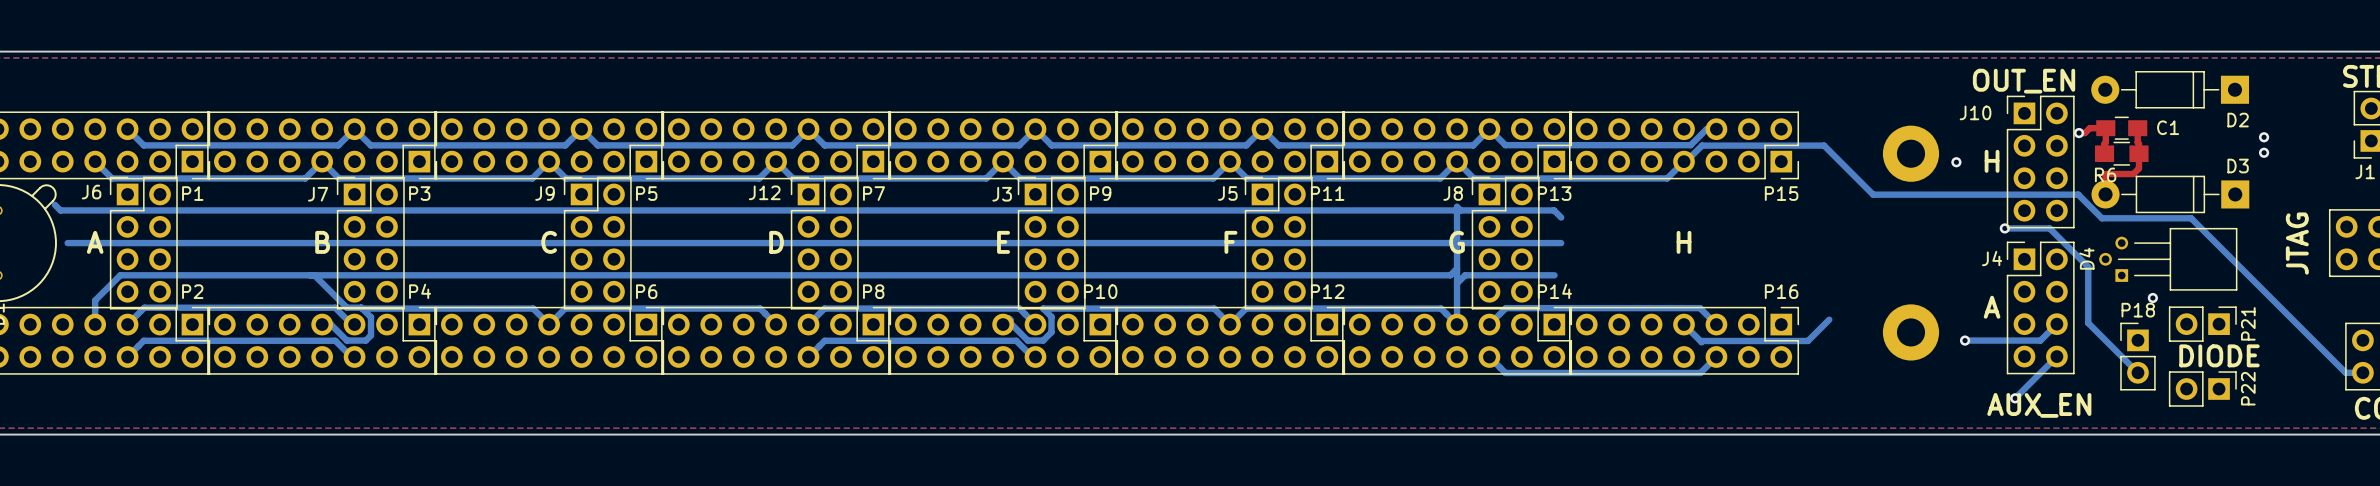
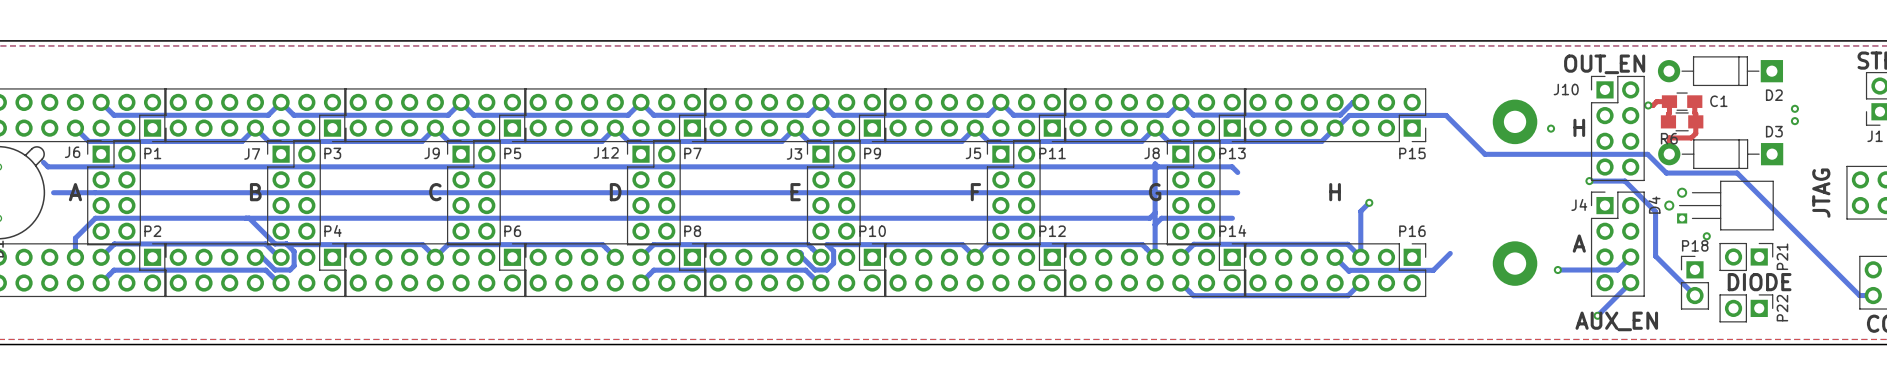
bottom track: none -> (1369, 202) (1360, 211) (1360, 257)
via: none -> (1369, 202)

